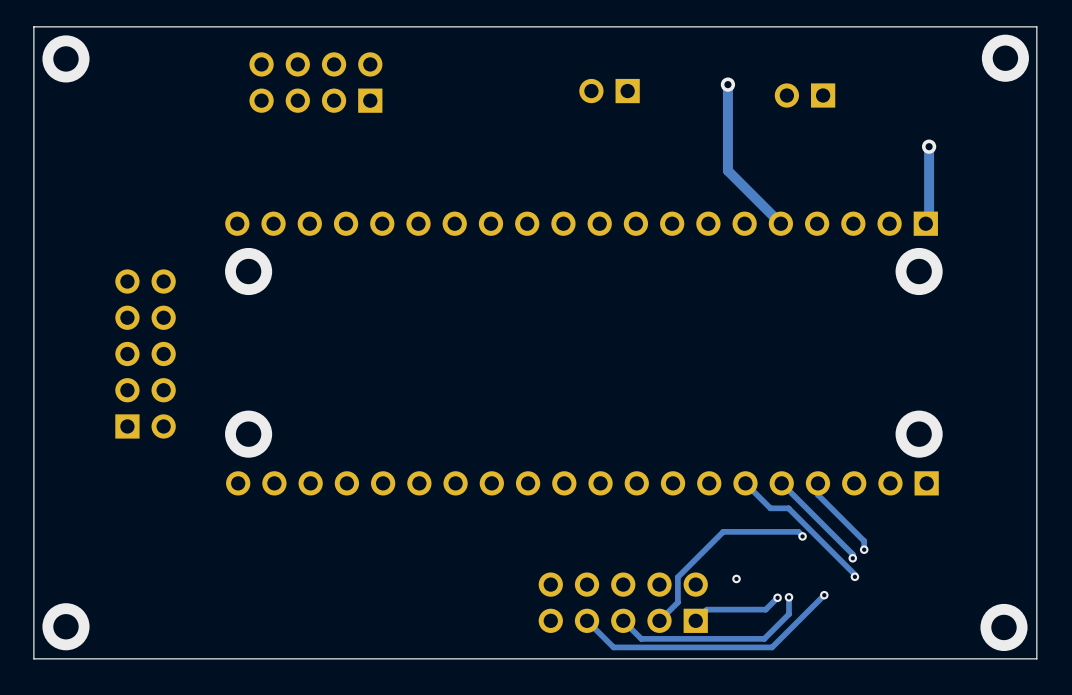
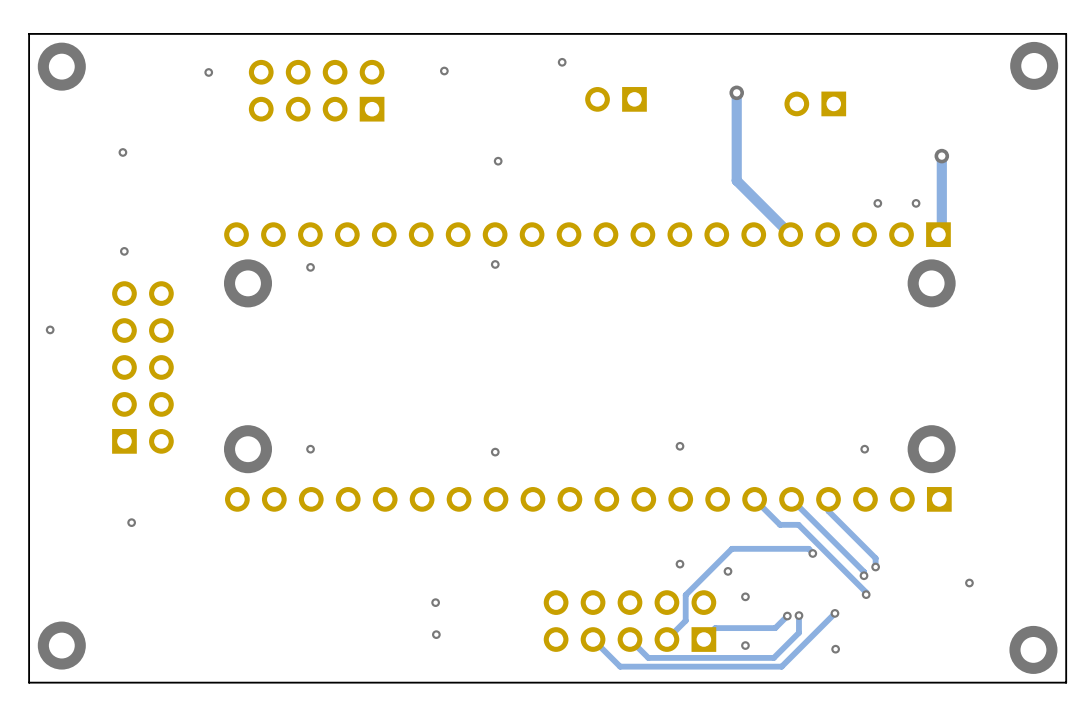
board edge: (1036, 26) (1036, 658) (33, 658) -> (1051, 33) (1066, 33) (1066, 682) (29, 682) (29, 678)
via: none -> (562, 62)
via position: (1005, 58) -> (1034, 65)
via: none -> (444, 71)
via: none -> (208, 72)
via: none -> (122, 152)
via: none -> (498, 161)
via: none -> (877, 203)
via: none -> (916, 203)
via: none -> (124, 251)
via: none -> (495, 264)
via: none -> (310, 267)
via: none -> (50, 329)
via: none -> (679, 446)
via: none -> (310, 449)
via: none -> (864, 449)
via: none -> (495, 452)
via: none -> (131, 522)
via: none -> (679, 564)
via: none -> (727, 571)
via: none -> (969, 583)
via: none -> (435, 602)
via: none -> (436, 634)
via: none -> (745, 645)
via position: (1004, 627) -> (1033, 649)
via: none -> (835, 649)

